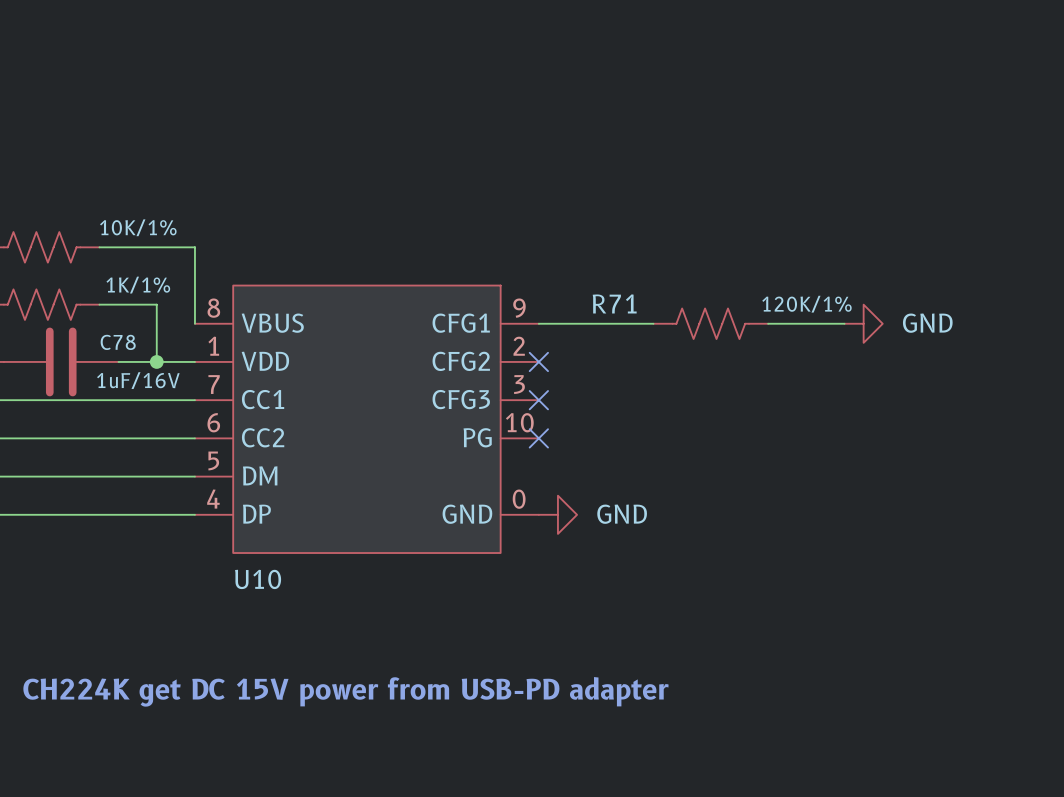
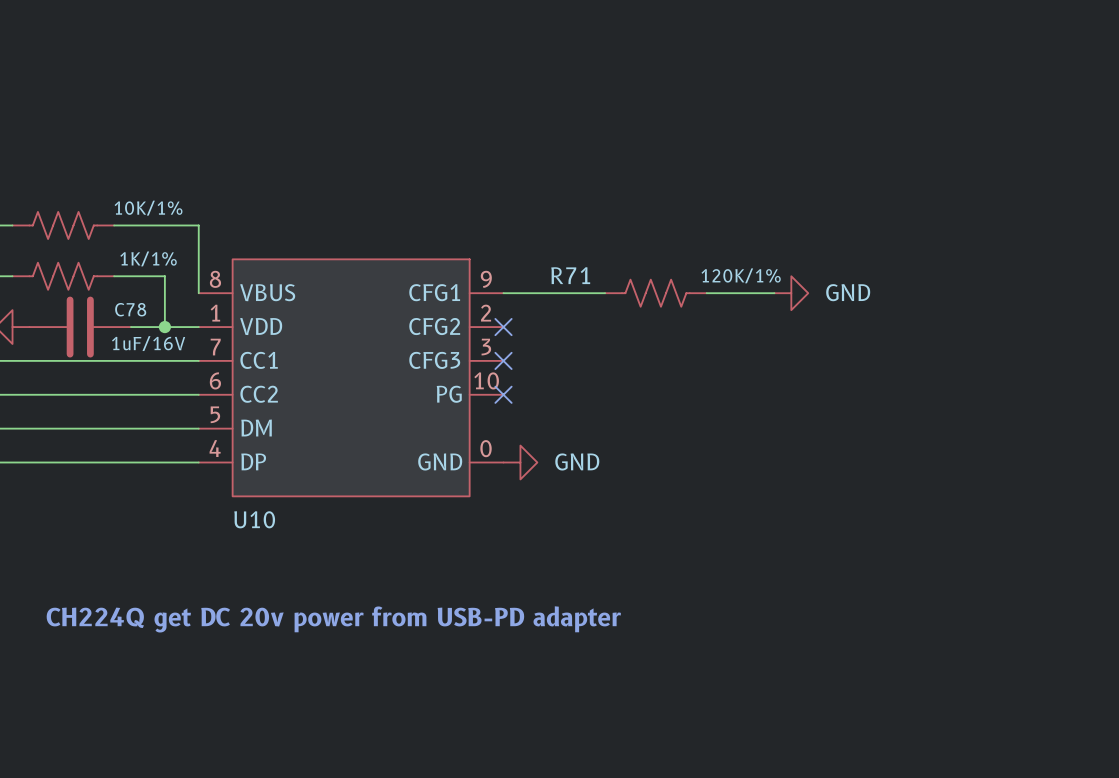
text: CH224K get DC 15V power from USB-PD adapter (345, 691) -> CH224Q get DC 20v power from USB-PD adapter (333, 619)

